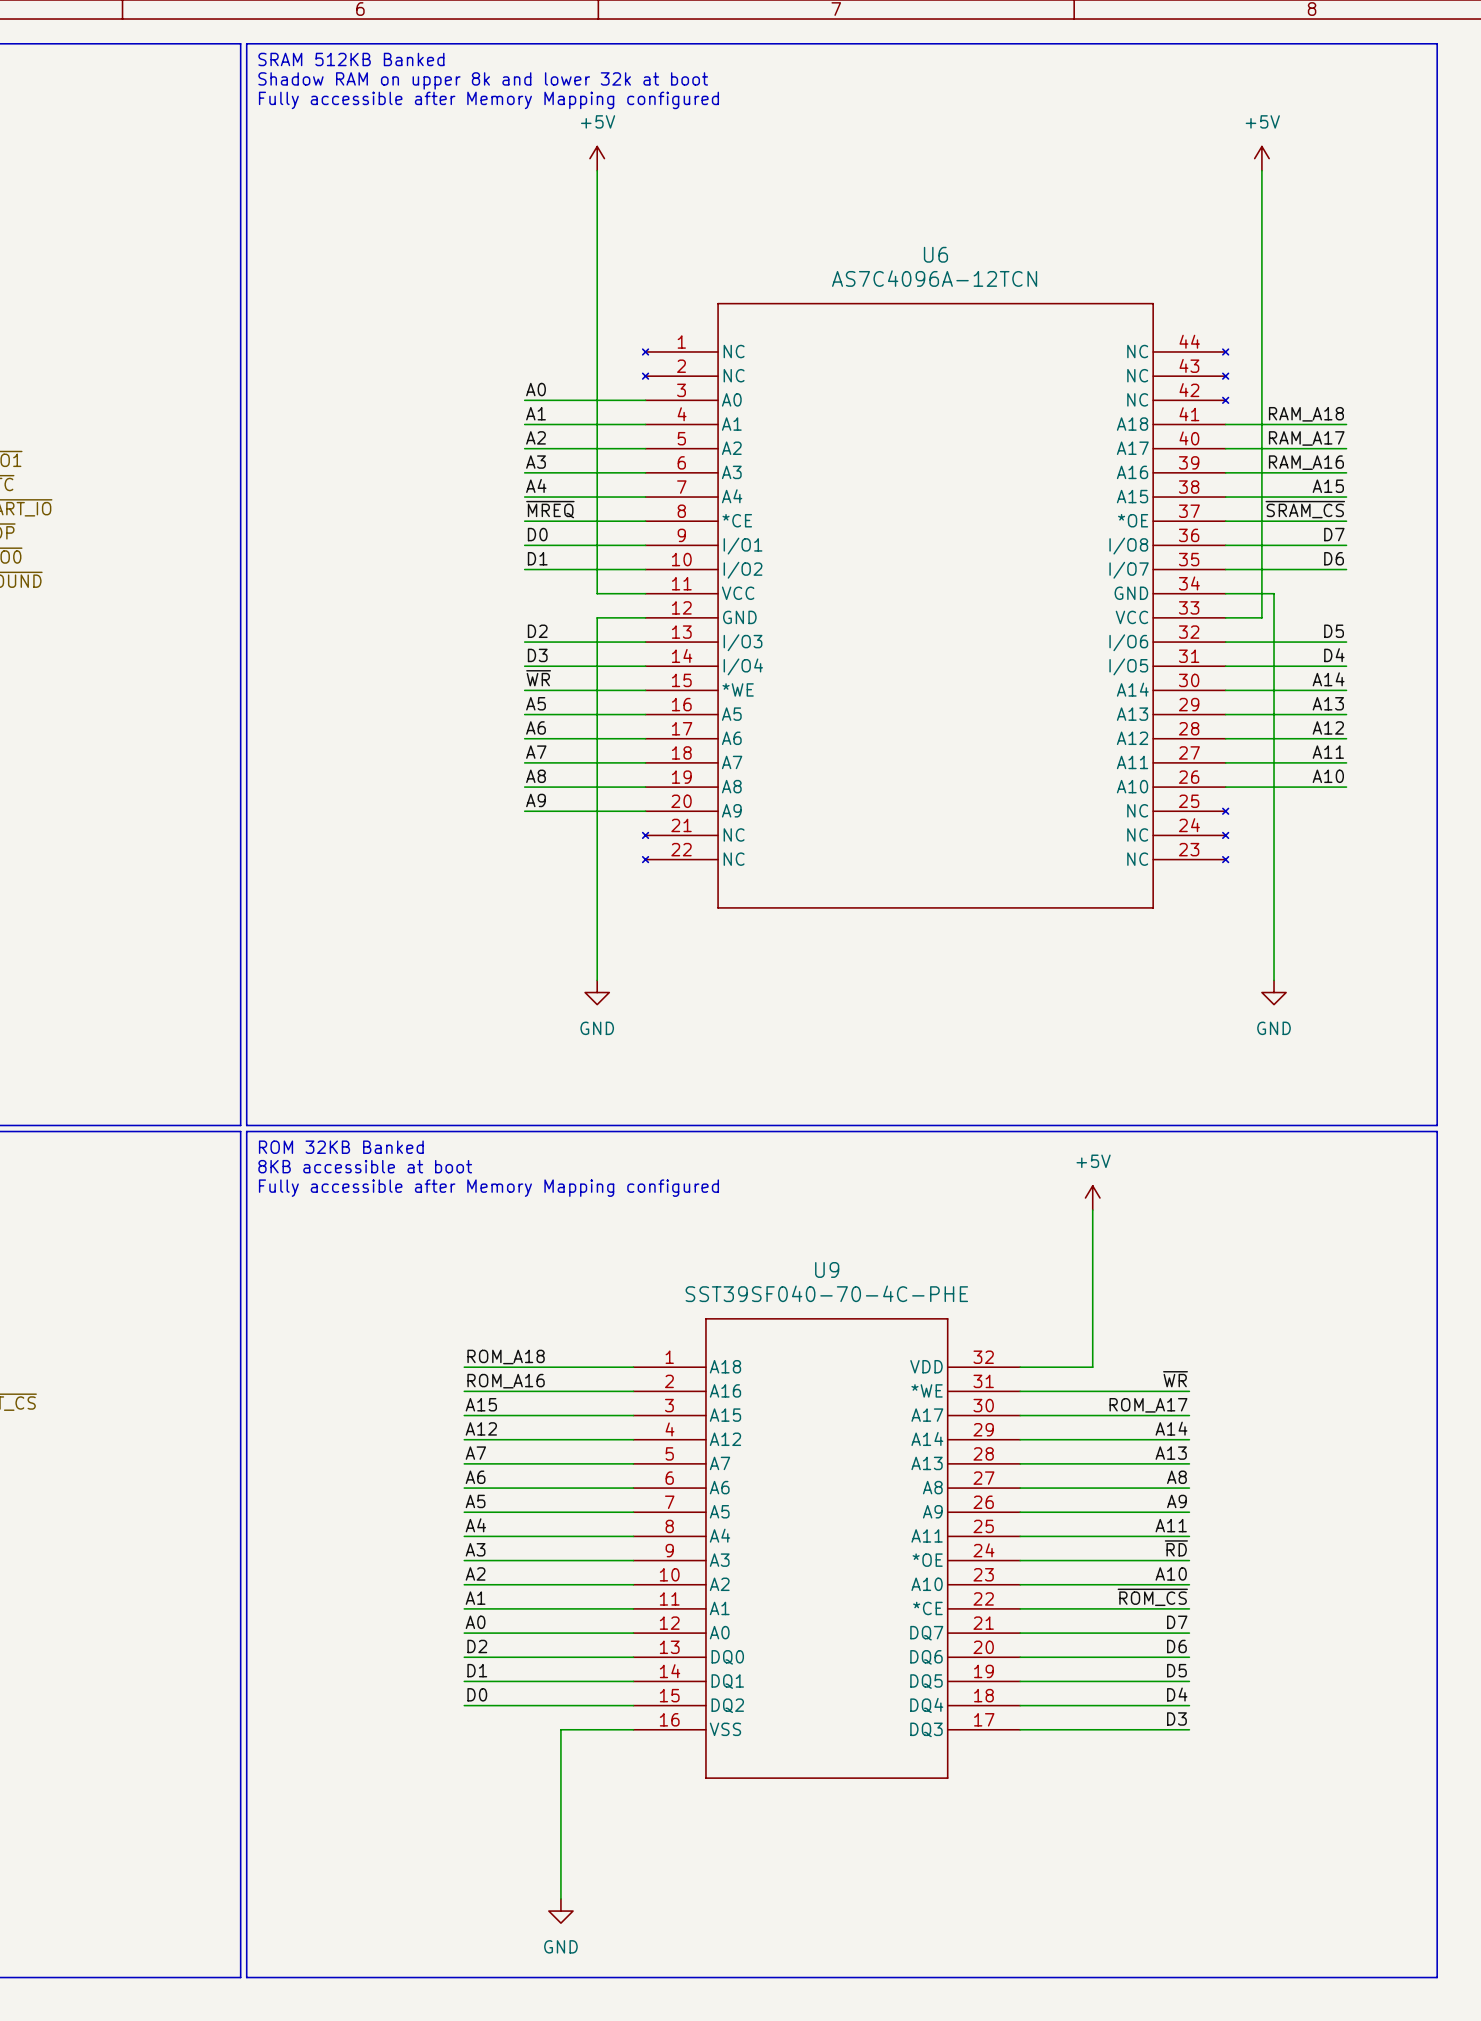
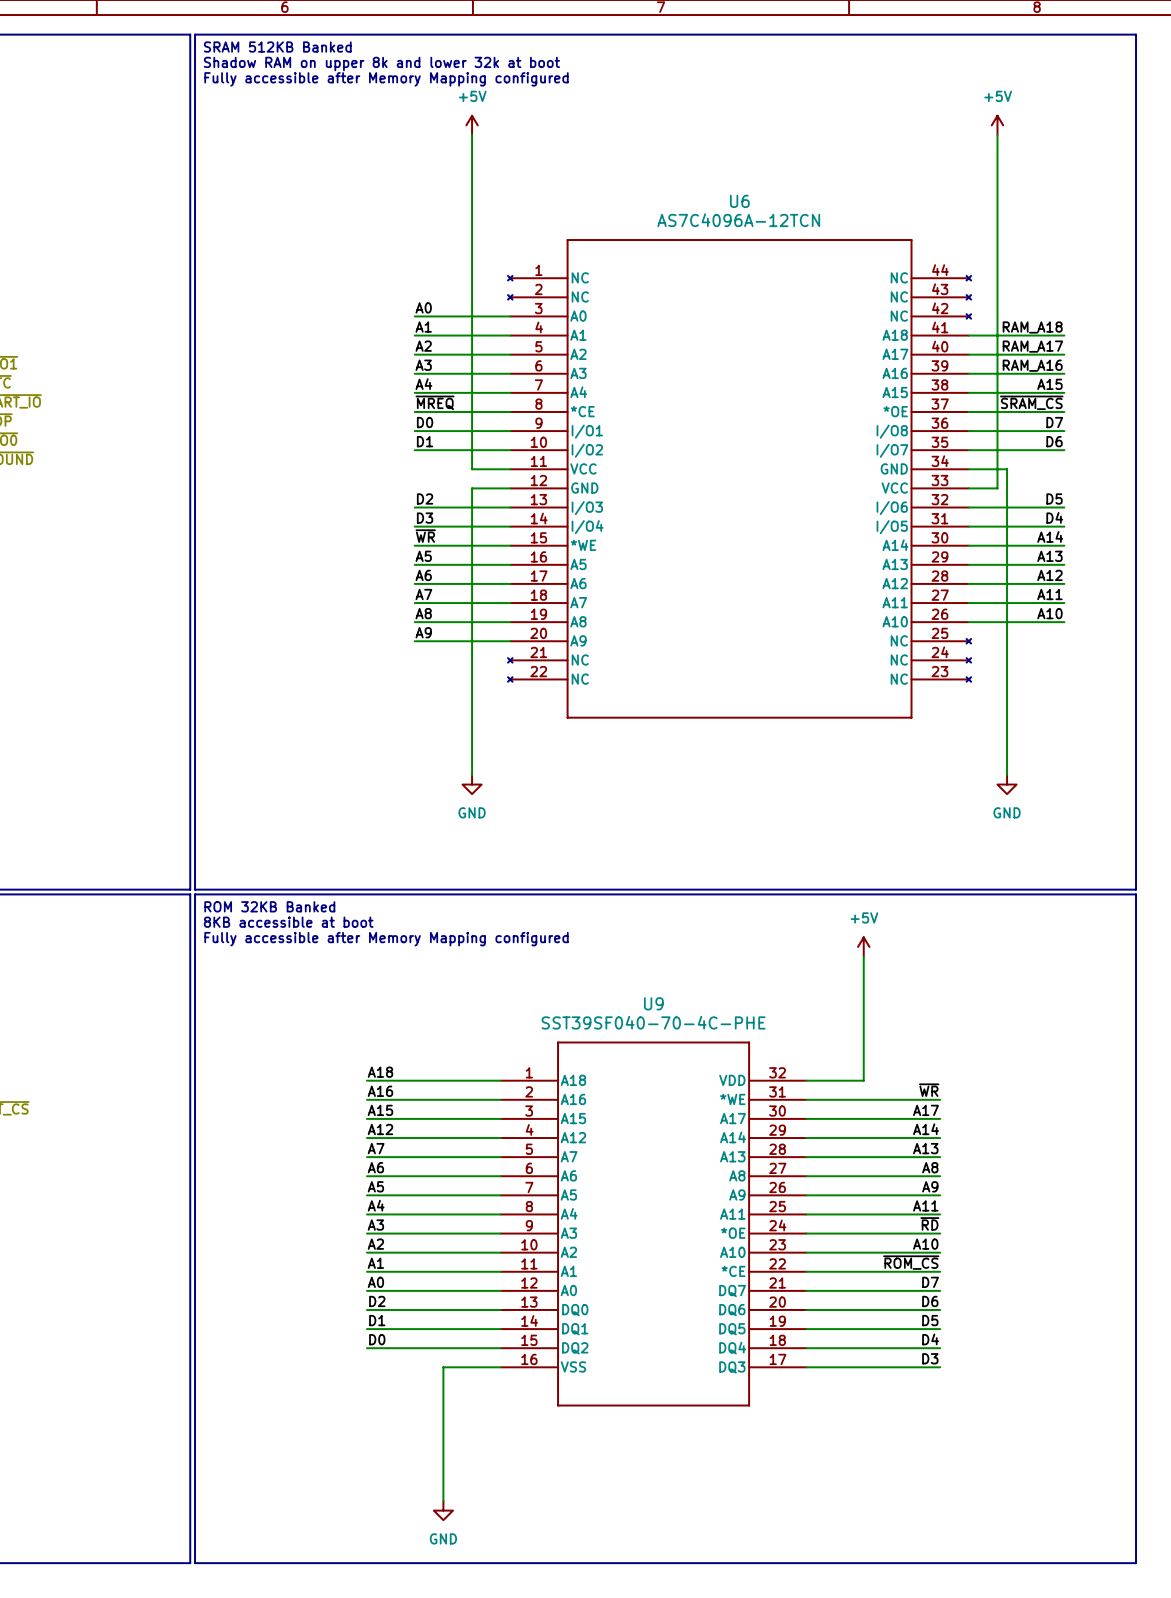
label: ROM_A18 (506, 1356) -> A18 (380, 1072)
label: ROM_A16 (506, 1381) -> A16 (380, 1091)
label: ROM_A17 (1148, 1405) -> A17 (926, 1110)

